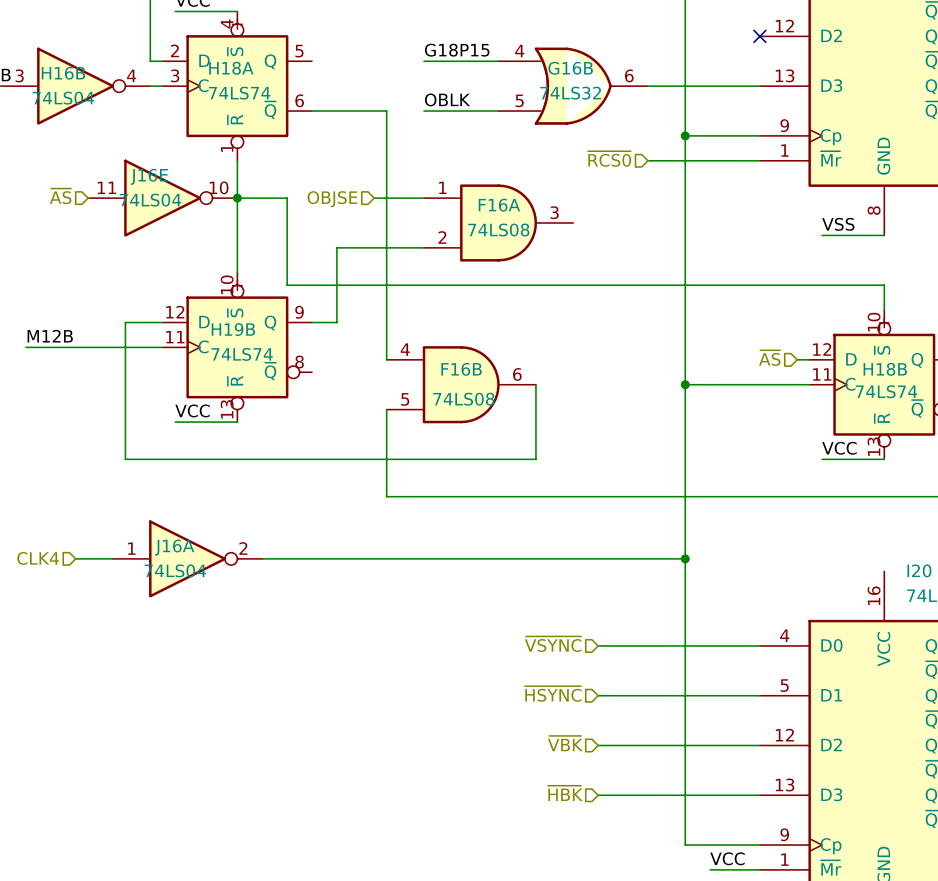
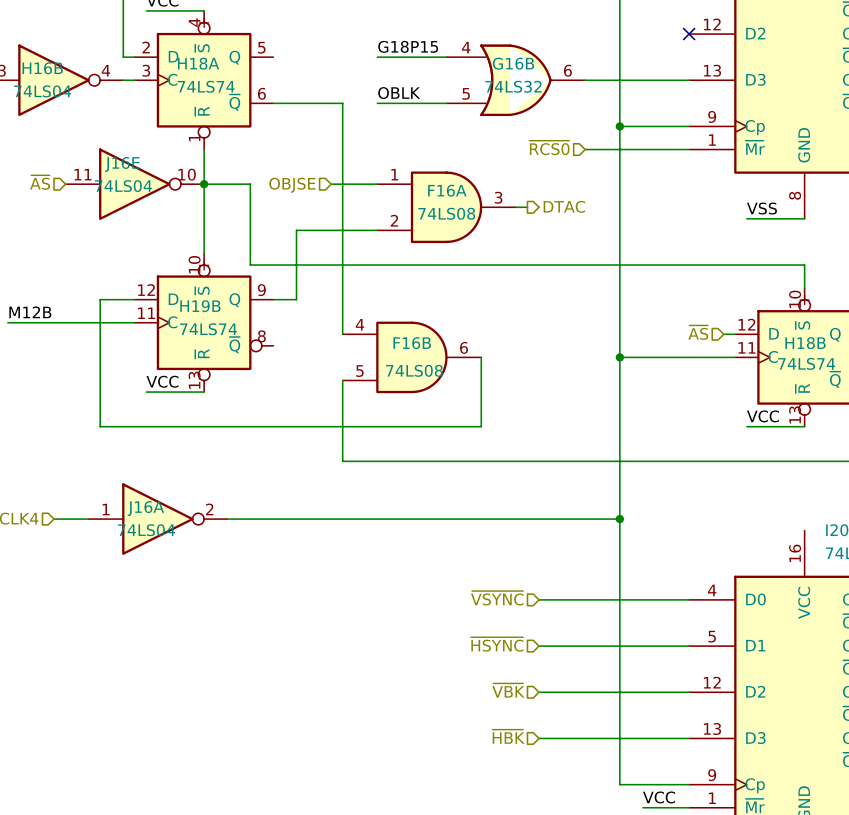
wire: none -> (515, 207) (527, 207)
hierarchical label: none -> DTAC (564, 206)

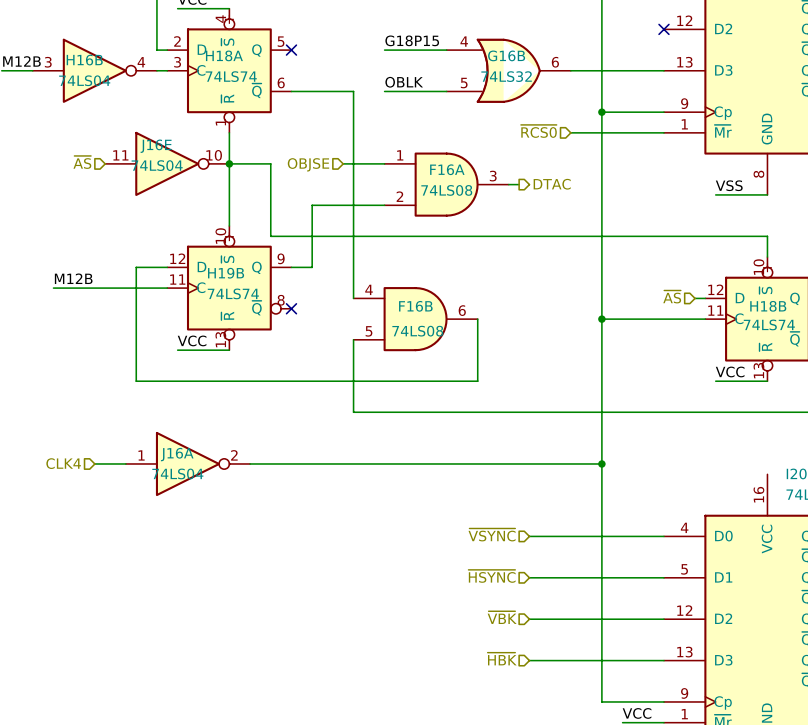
no-connect mark: none -> (291, 50)
no-connect mark: none -> (291, 308)

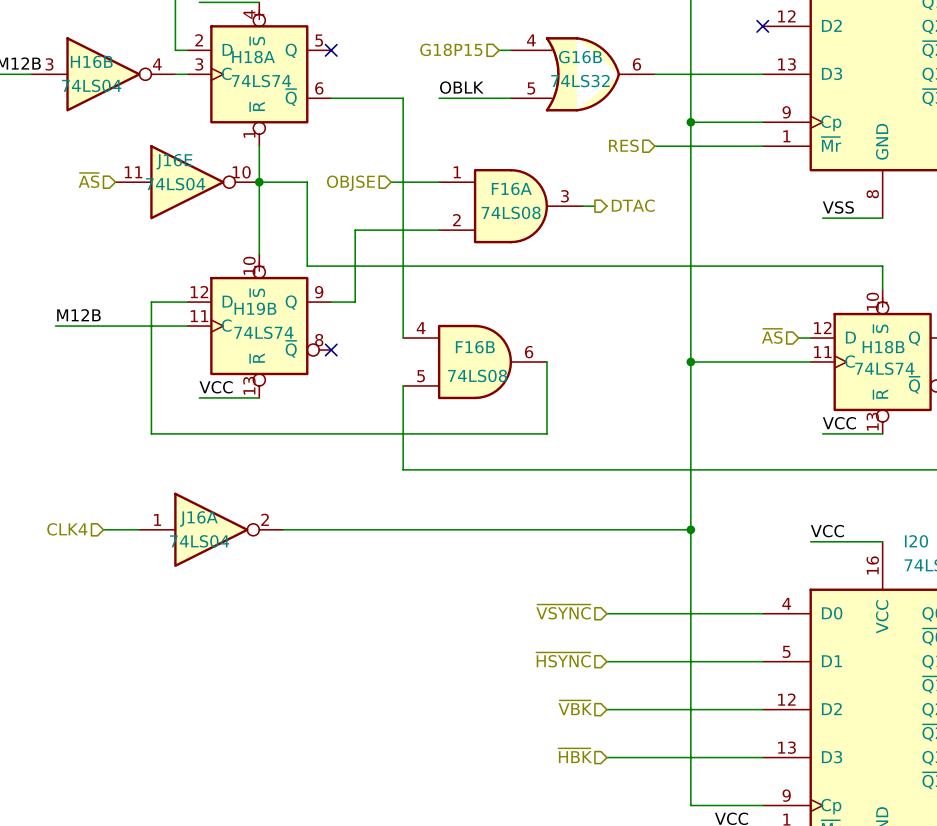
label: G18P15 (412, 40) -> none
hierarchical label: none -> G18P15 (451, 49)
wire: (384, 50) (436, 50) -> none
hierarchical label: ~{RCS0} (538, 131) -> RES (623, 145)
label: none -> VCC (827, 531)
wire: none -> (810, 541) (882, 541)

